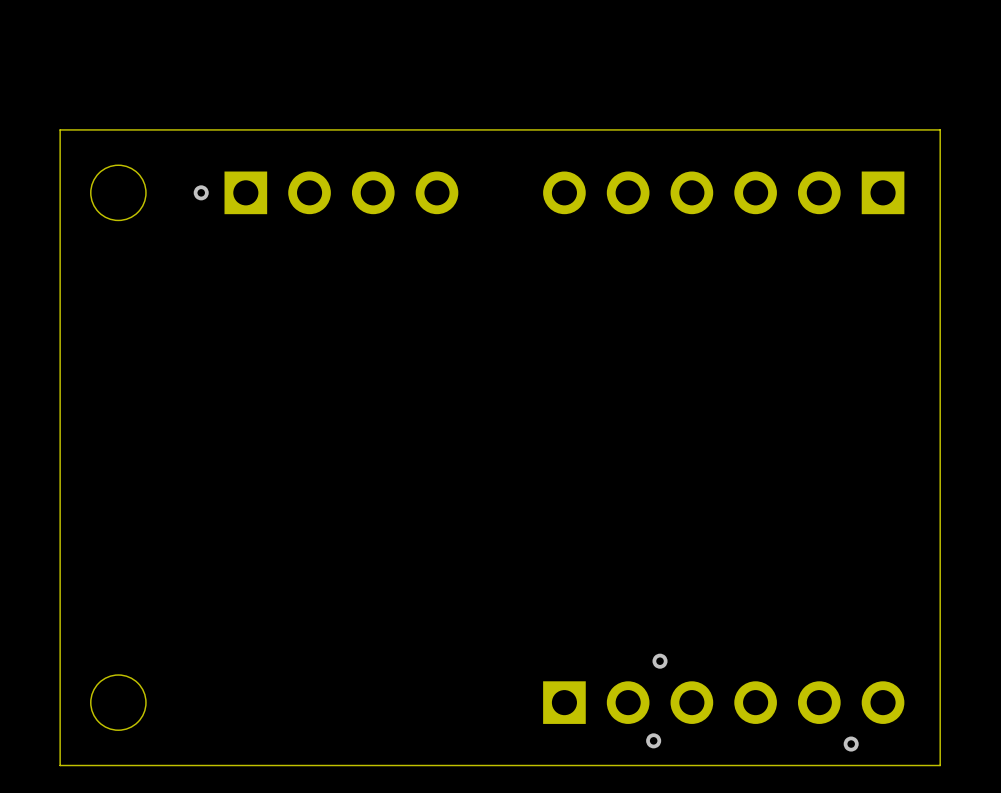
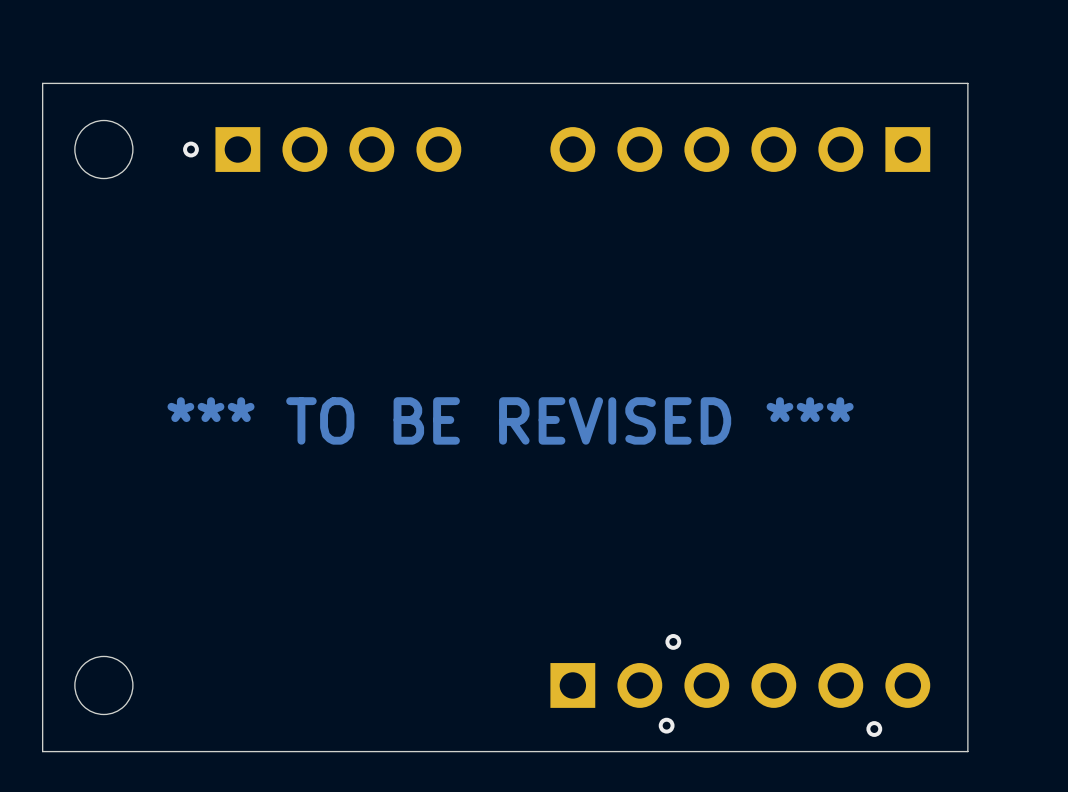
text: none -> *** TO BE REVISED *** (510, 420)

